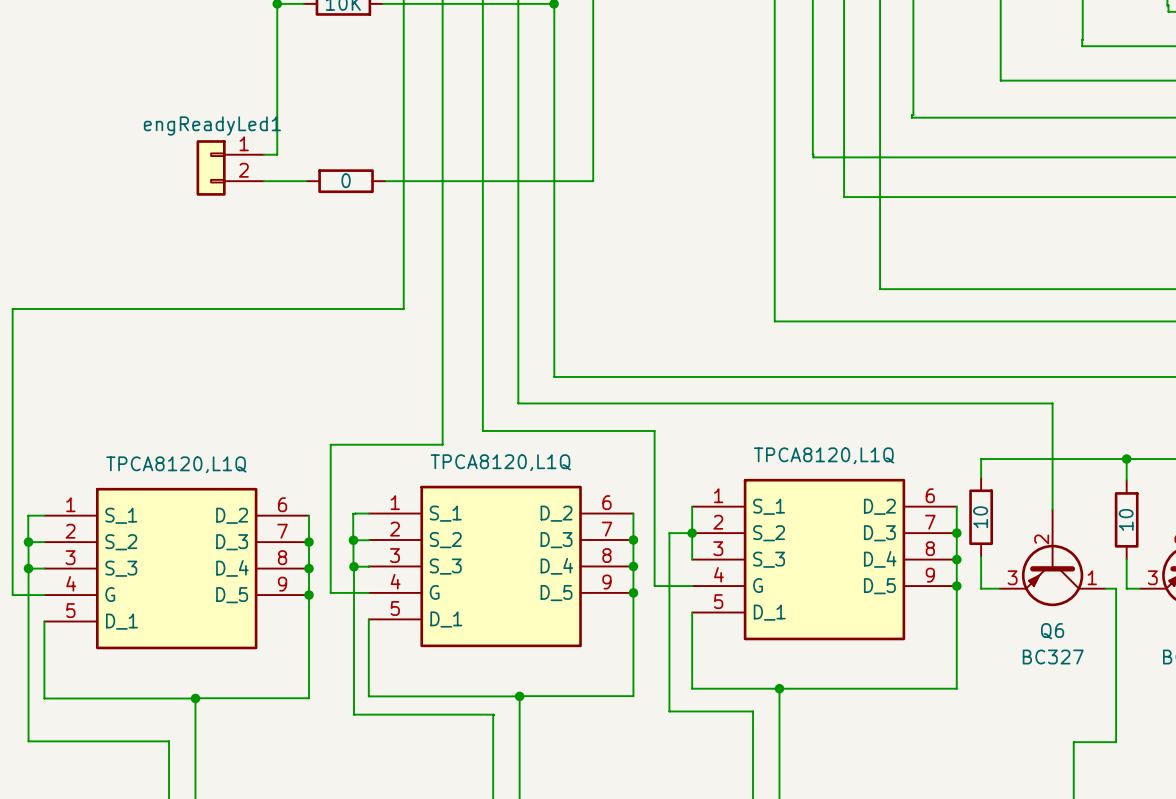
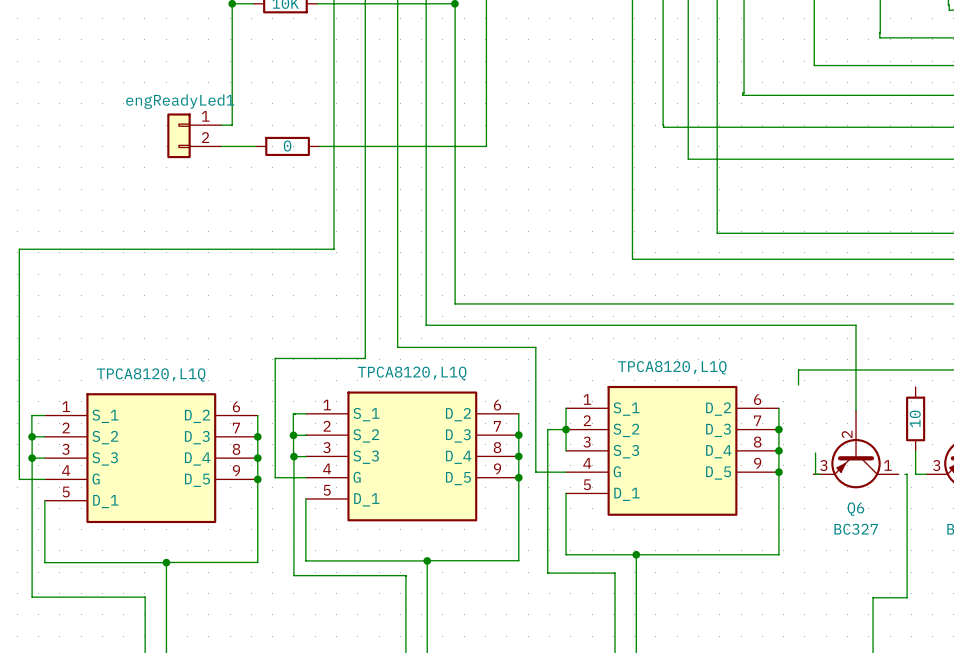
wire: (1126, 459) (1126, 480) -> none
junction: (1126, 459) -> none
part: 10 (981, 517) -> none
wire: (981, 556) (981, 588) (999, 588) -> none
wire: none -> (815, 453) (815, 474) (819, 474)
wire: (1105, 588) (1113, 588) -> none

